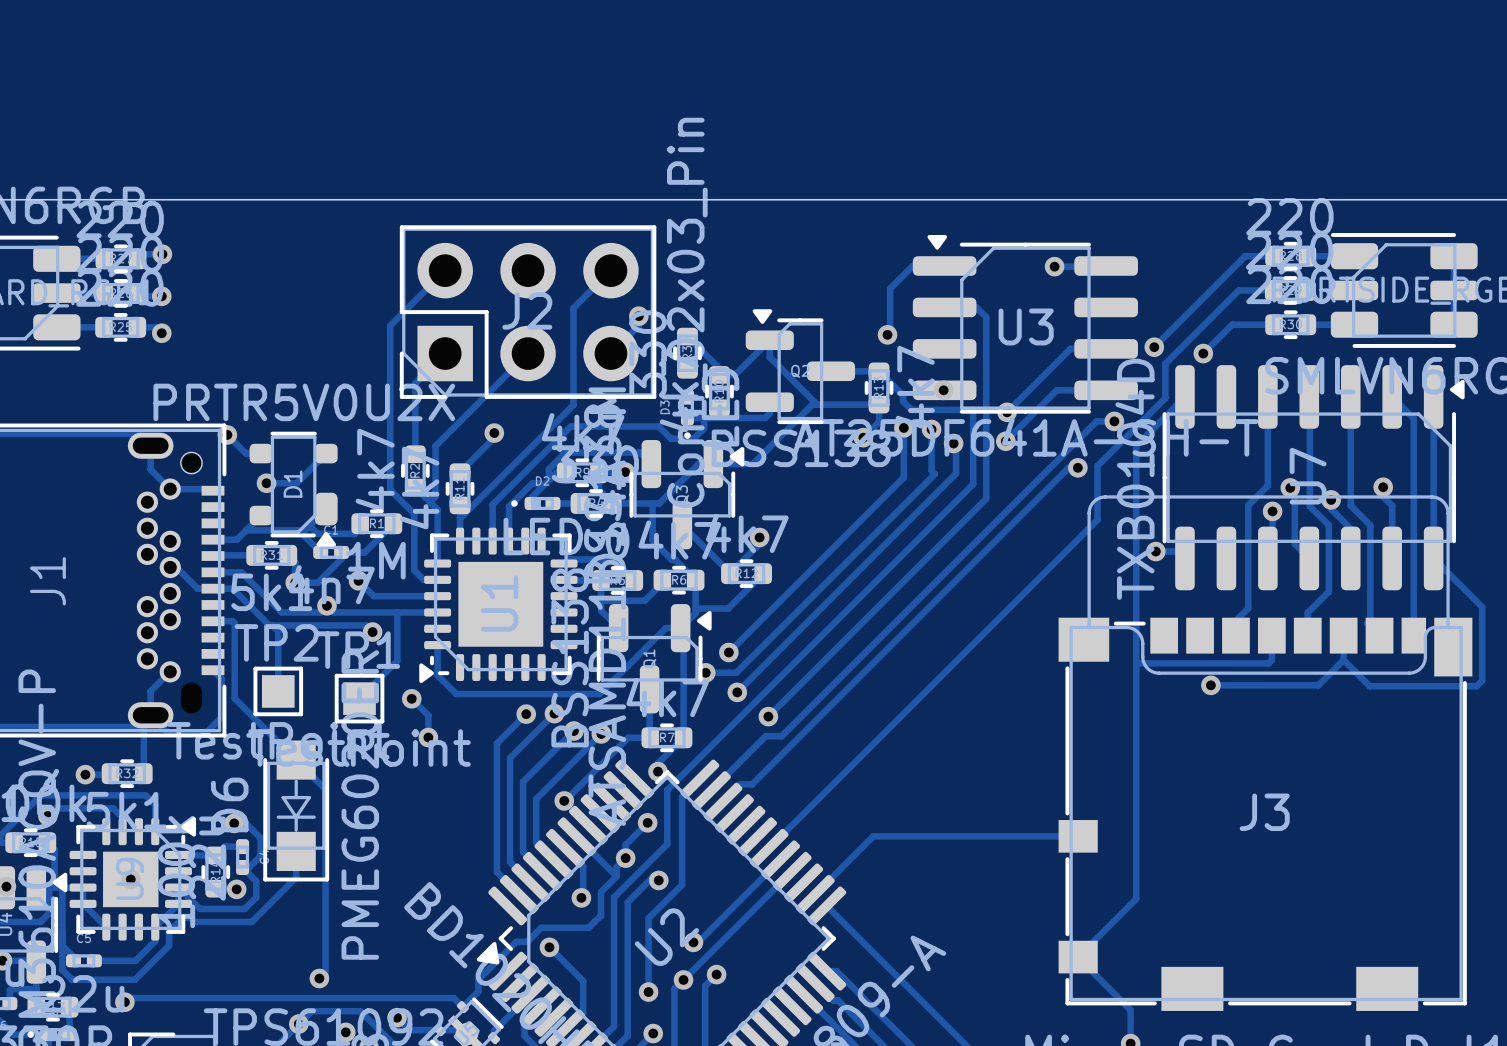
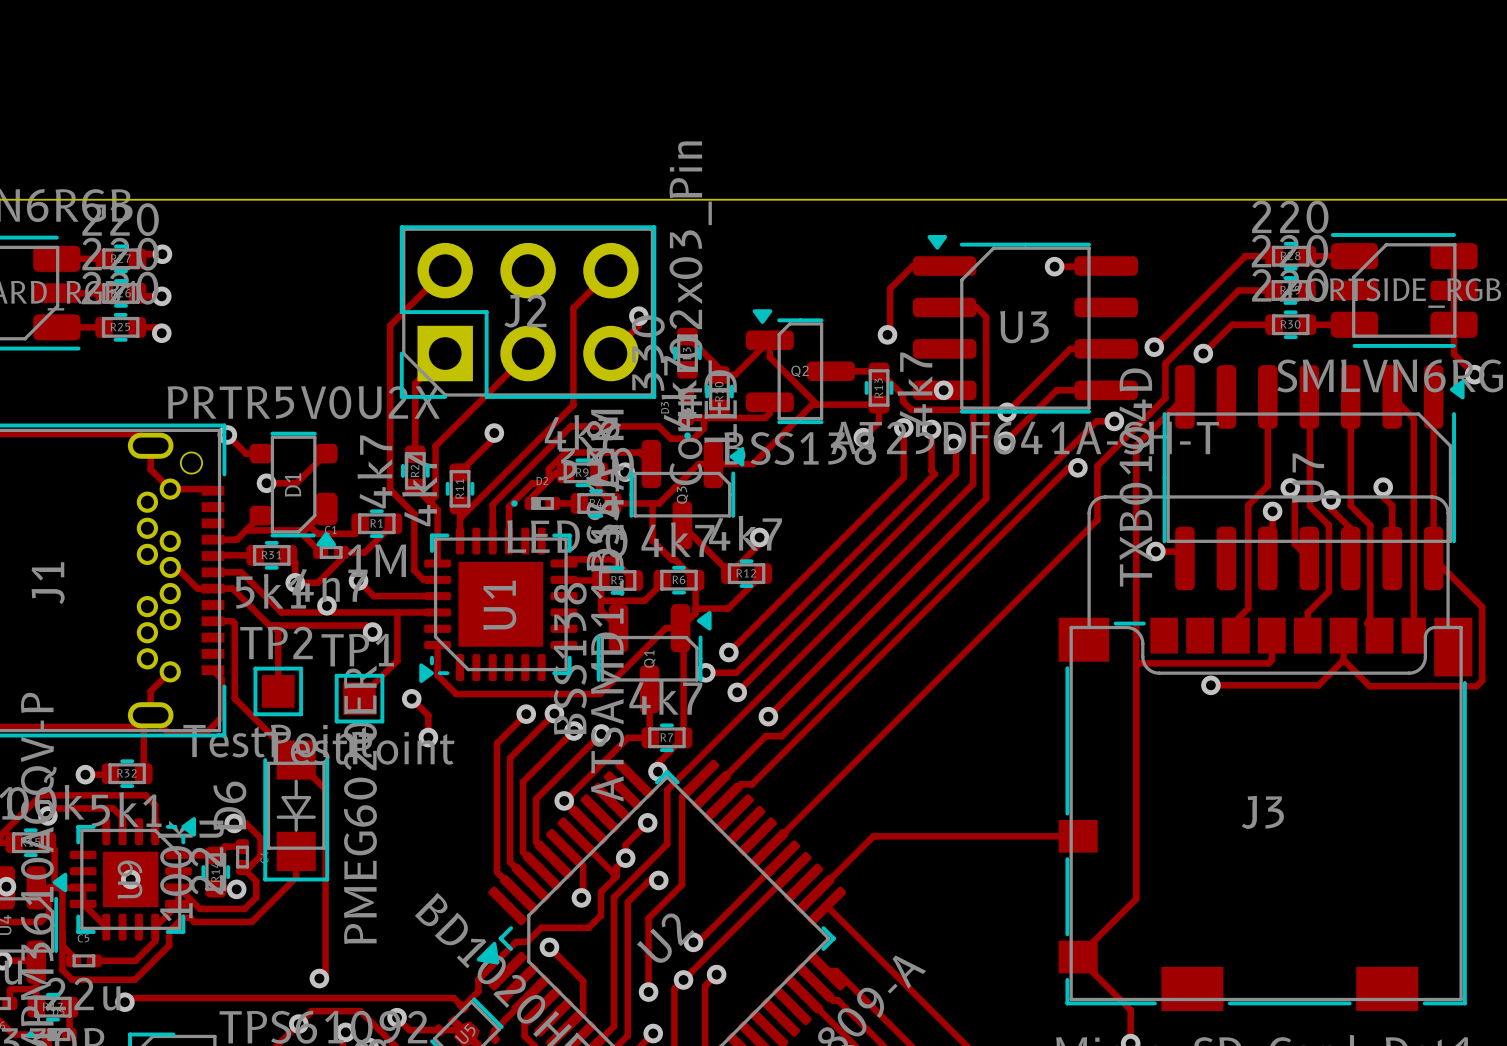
track: none -> (1454, 324) (1454, 354) (1474, 374)
via: none -> (1474, 374)

